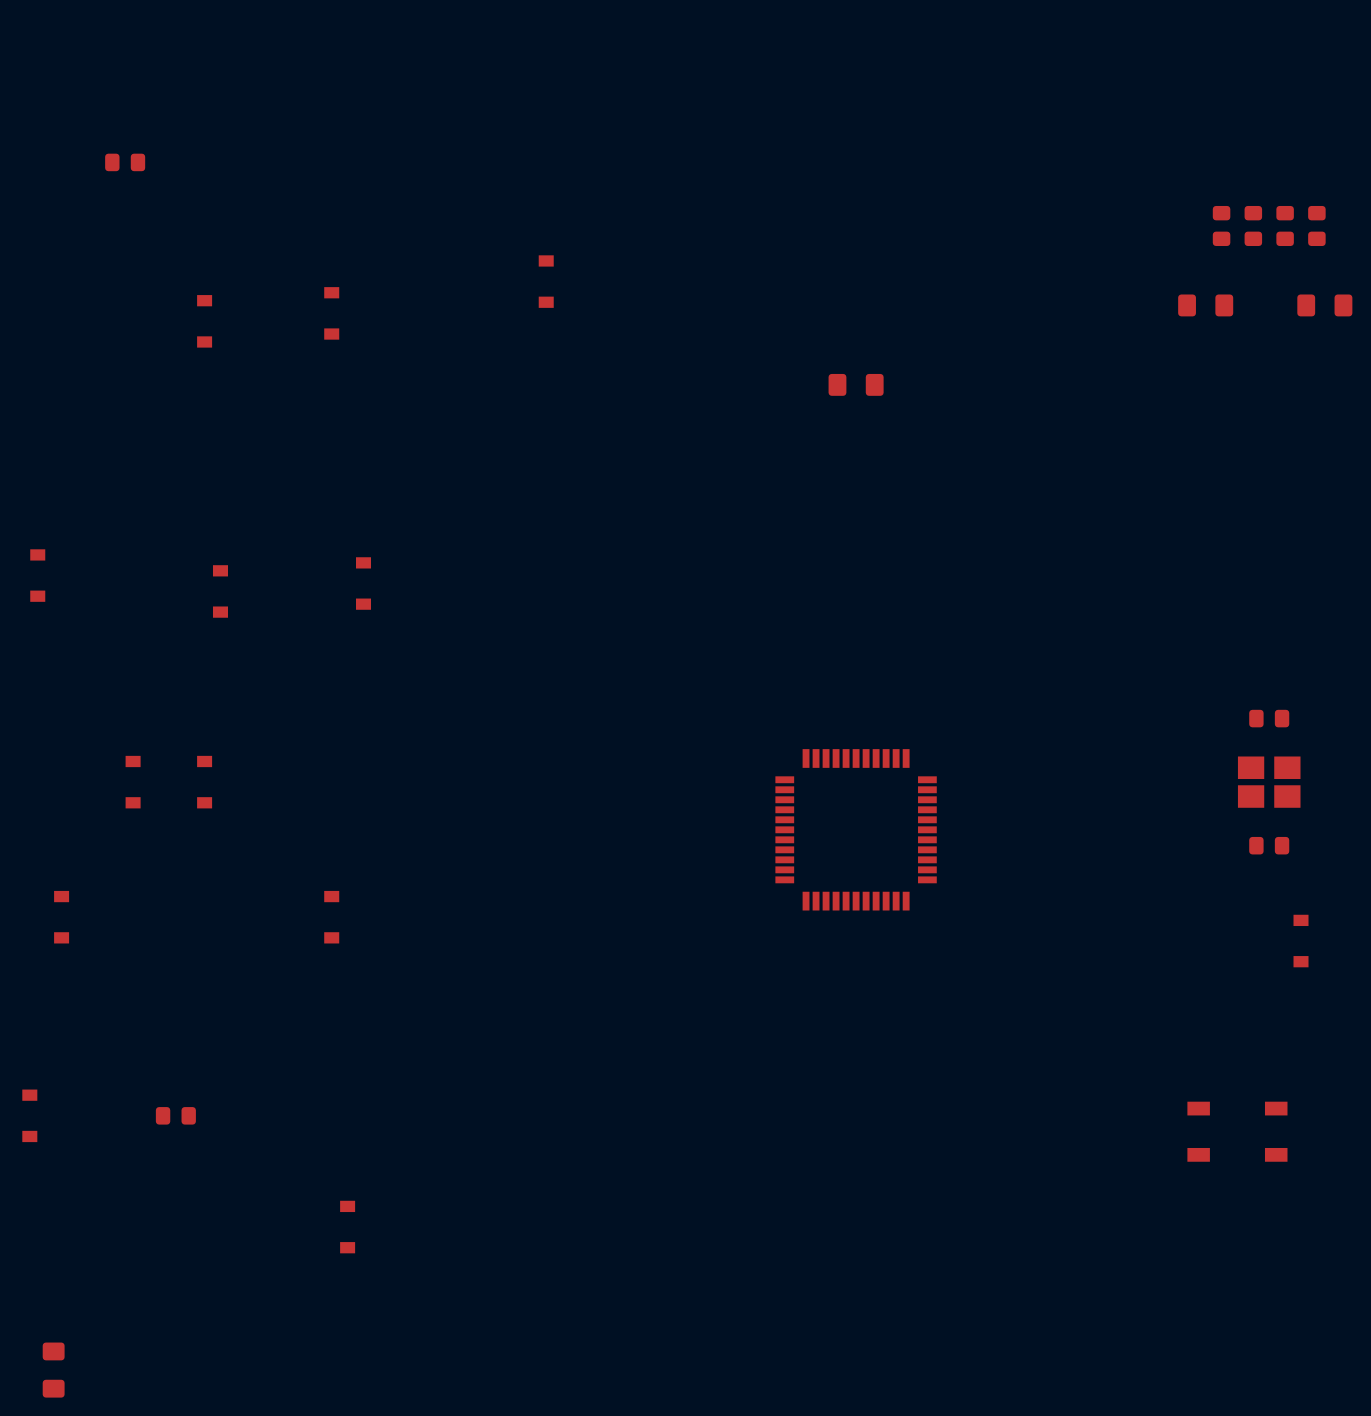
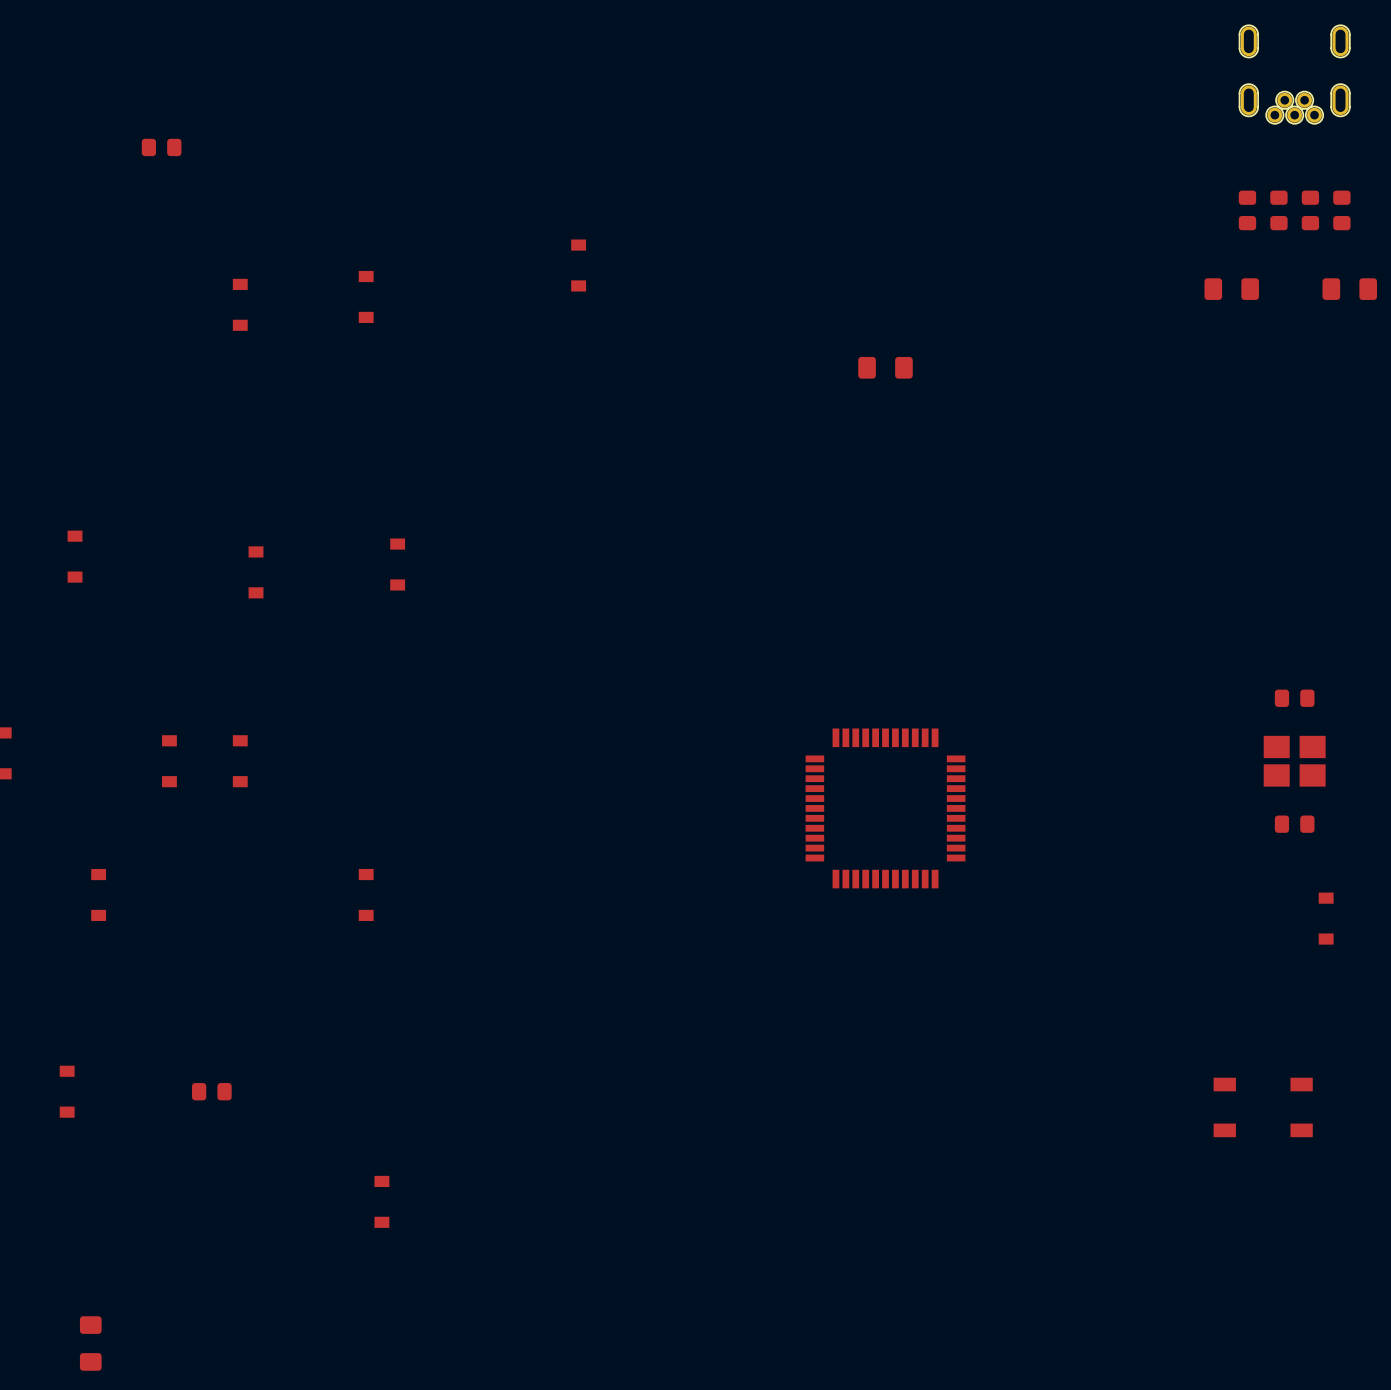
part: none -> (1294, 74)

